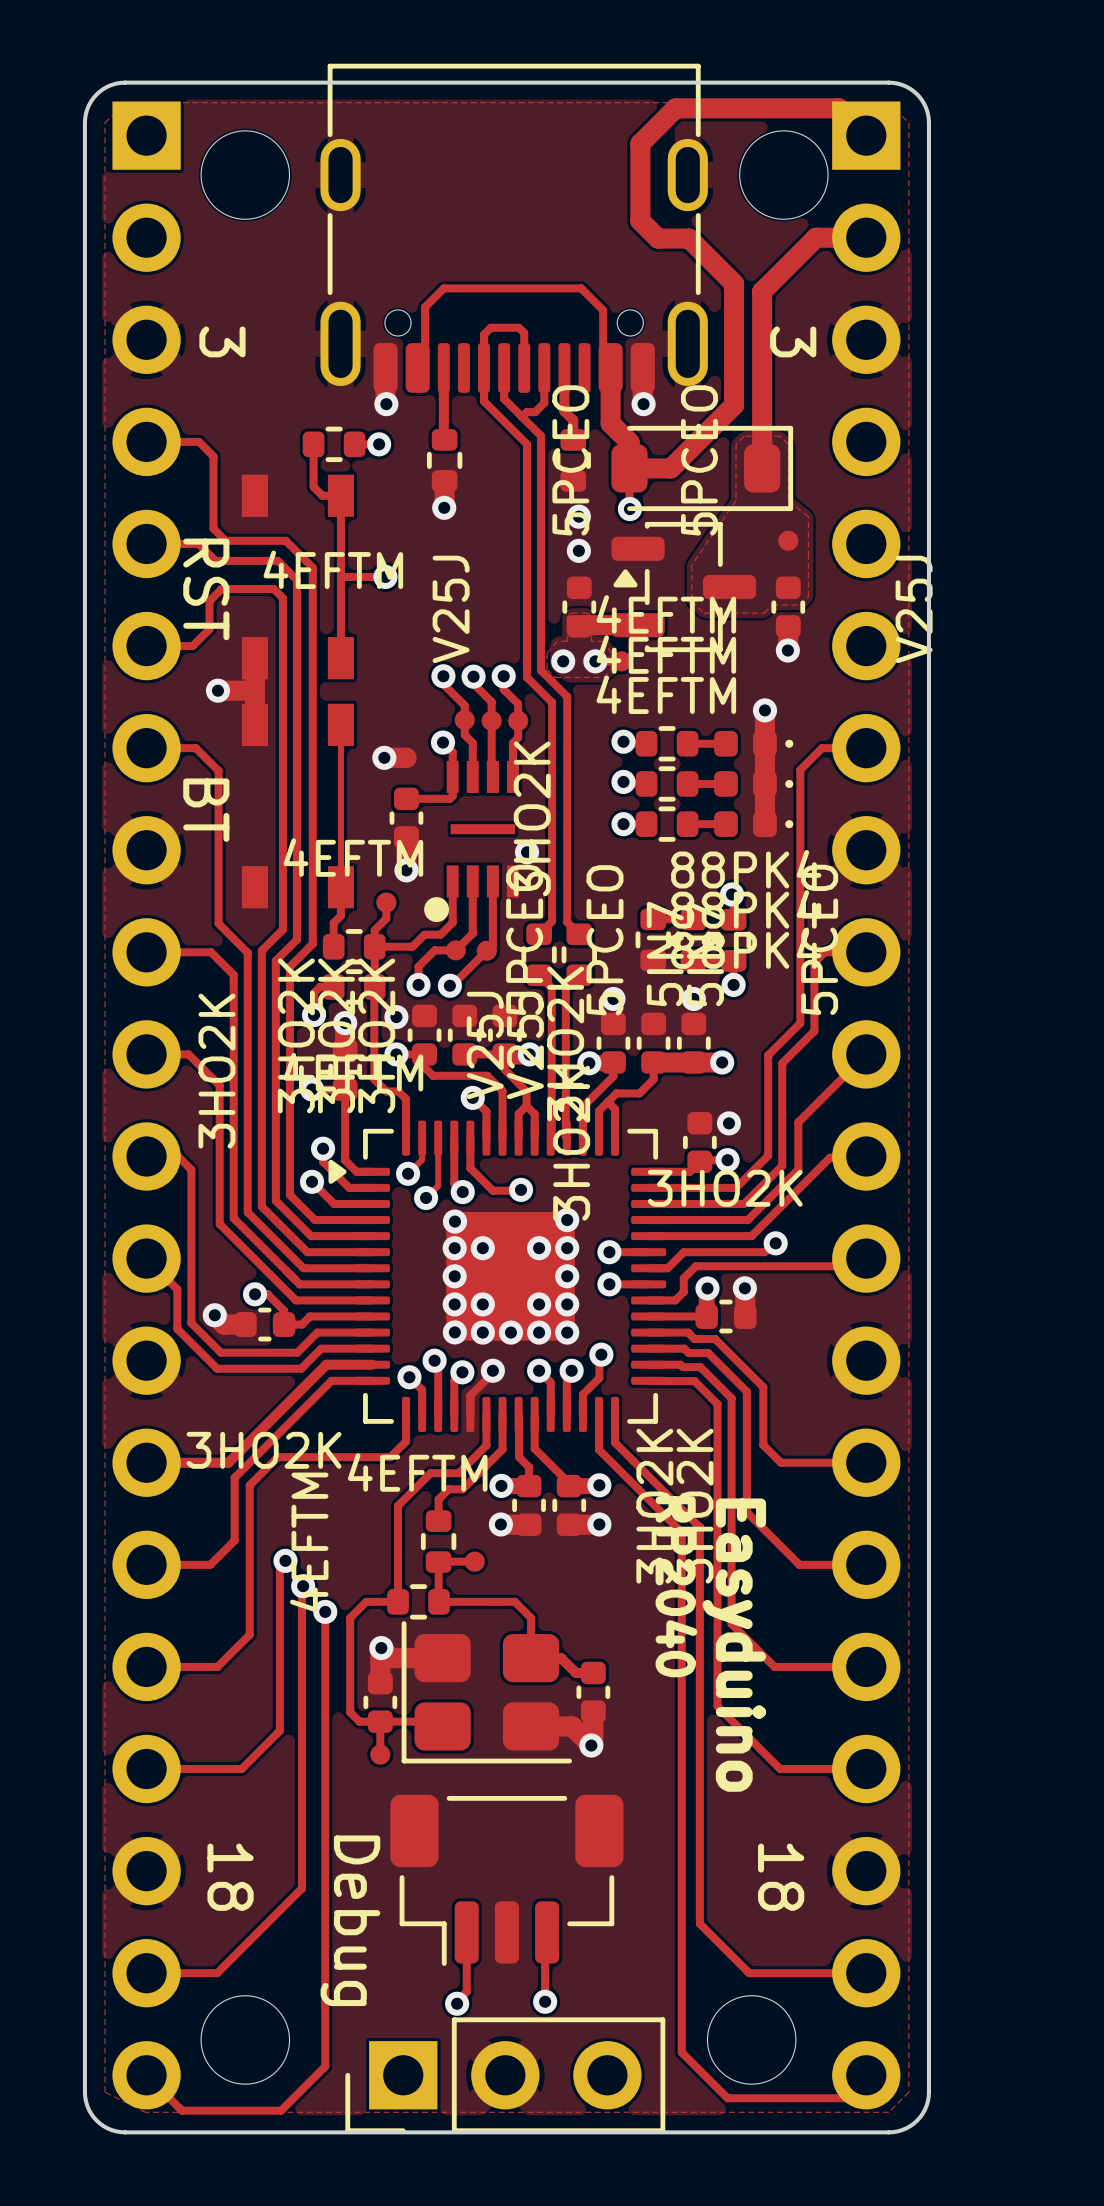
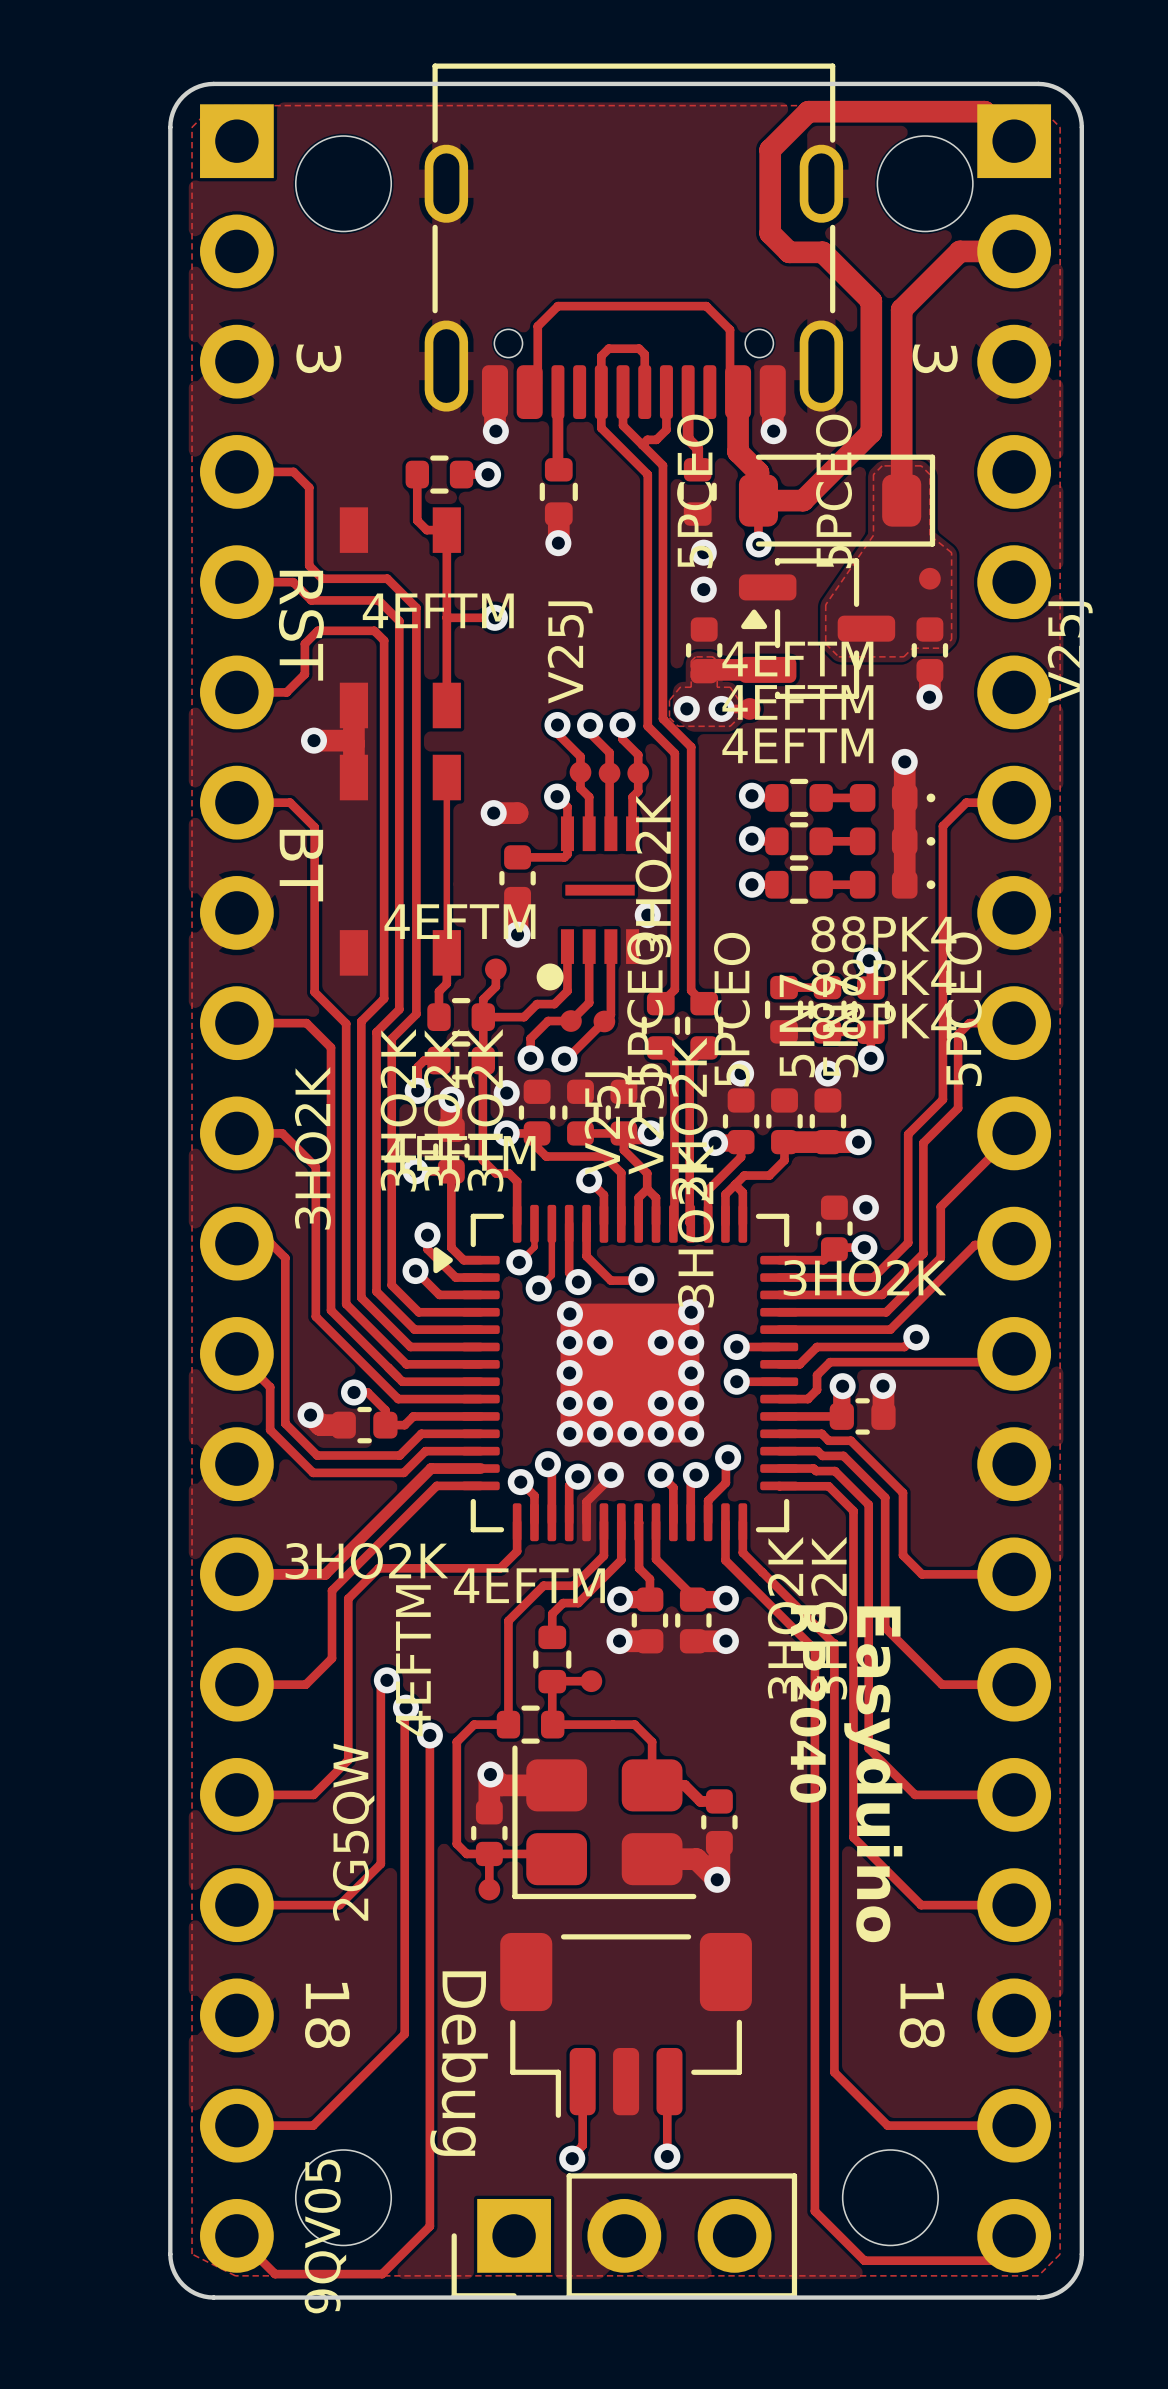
part text: none -> 2G5QW (353, 1832)
part text: none -> 9QV05 (325, 2236)

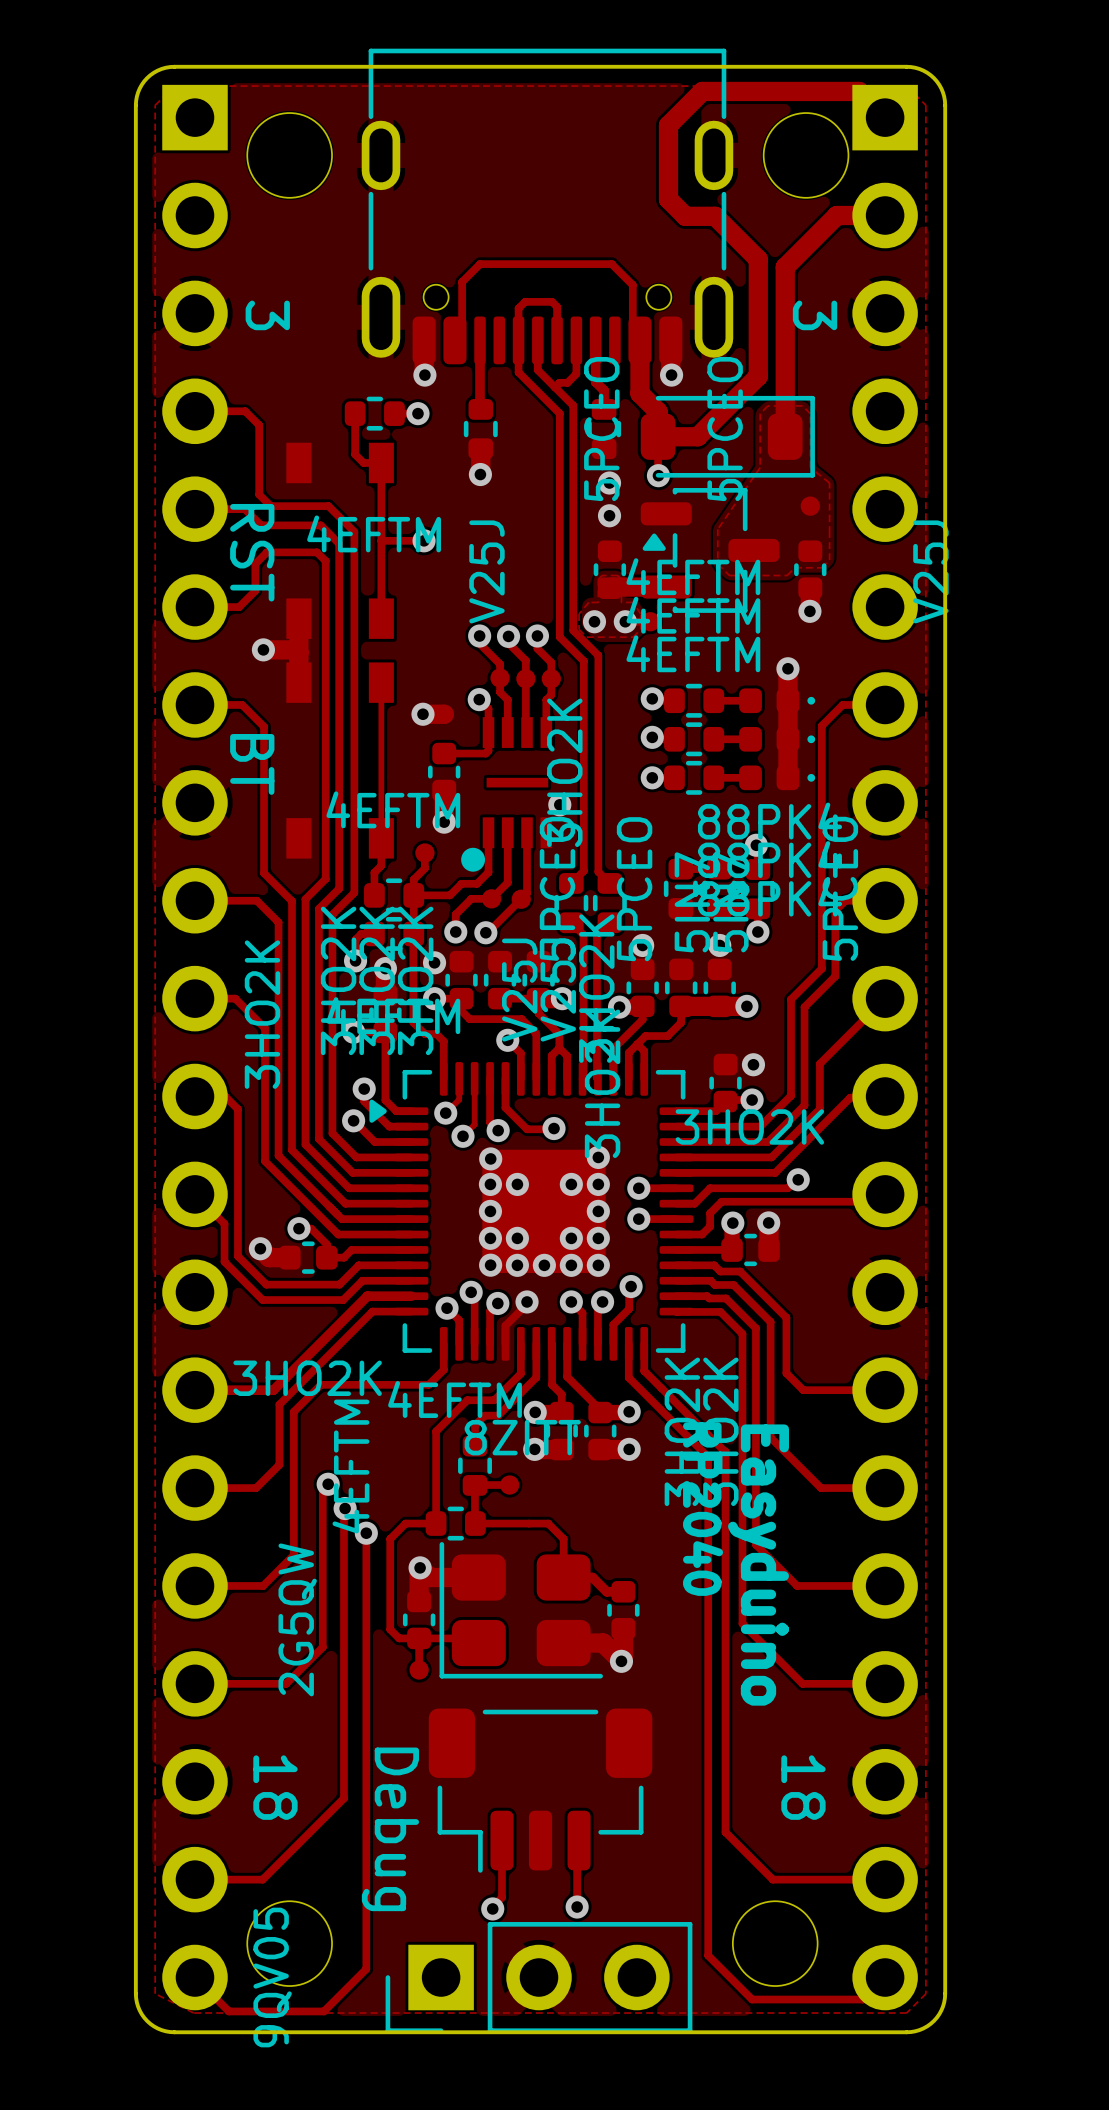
part text: none -> 8ZITT (522, 1437)

